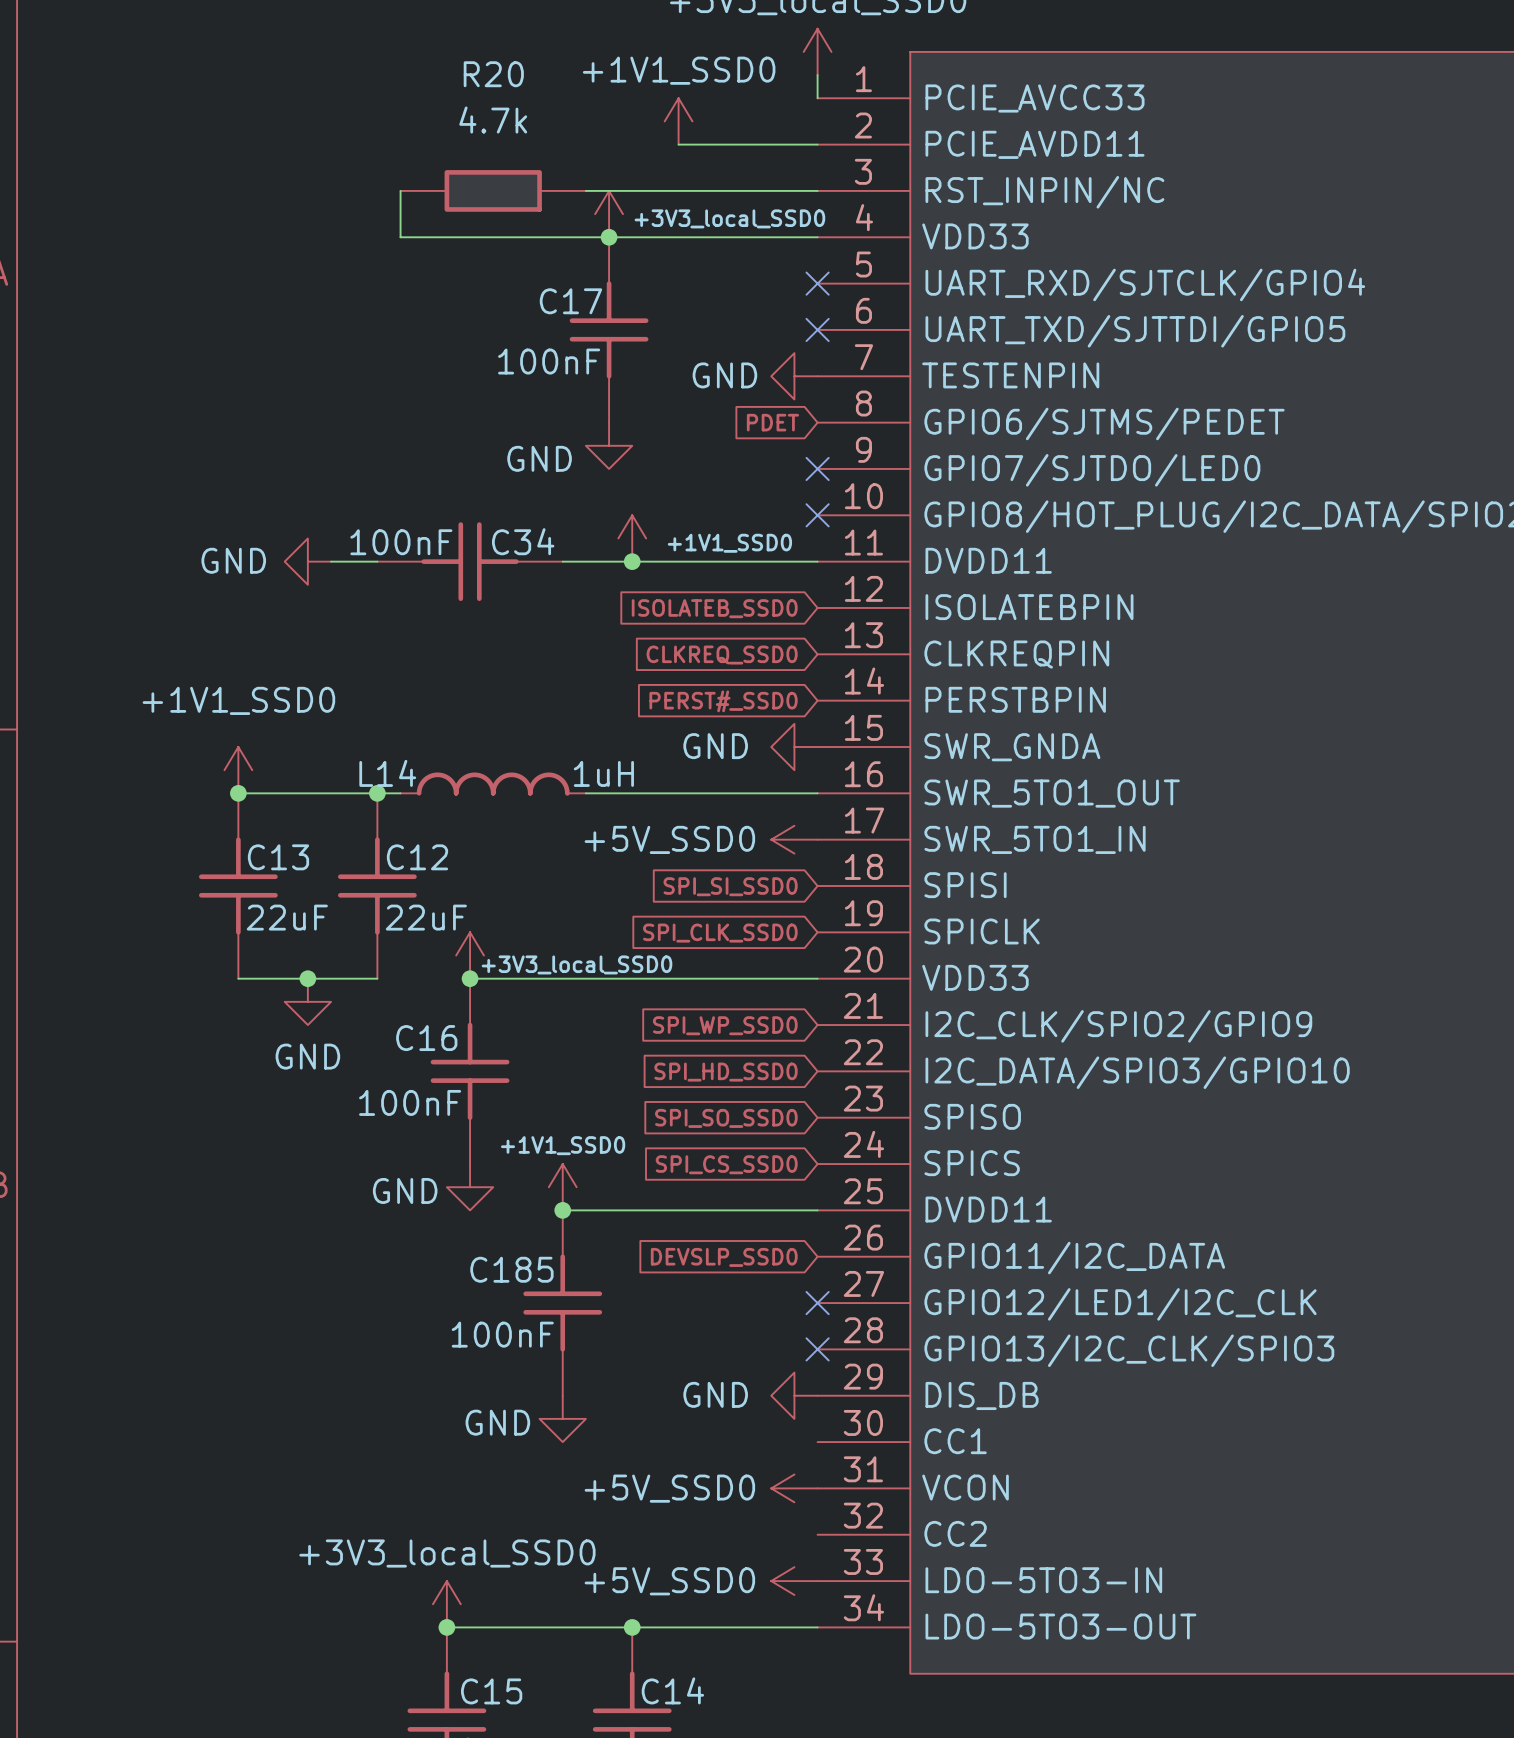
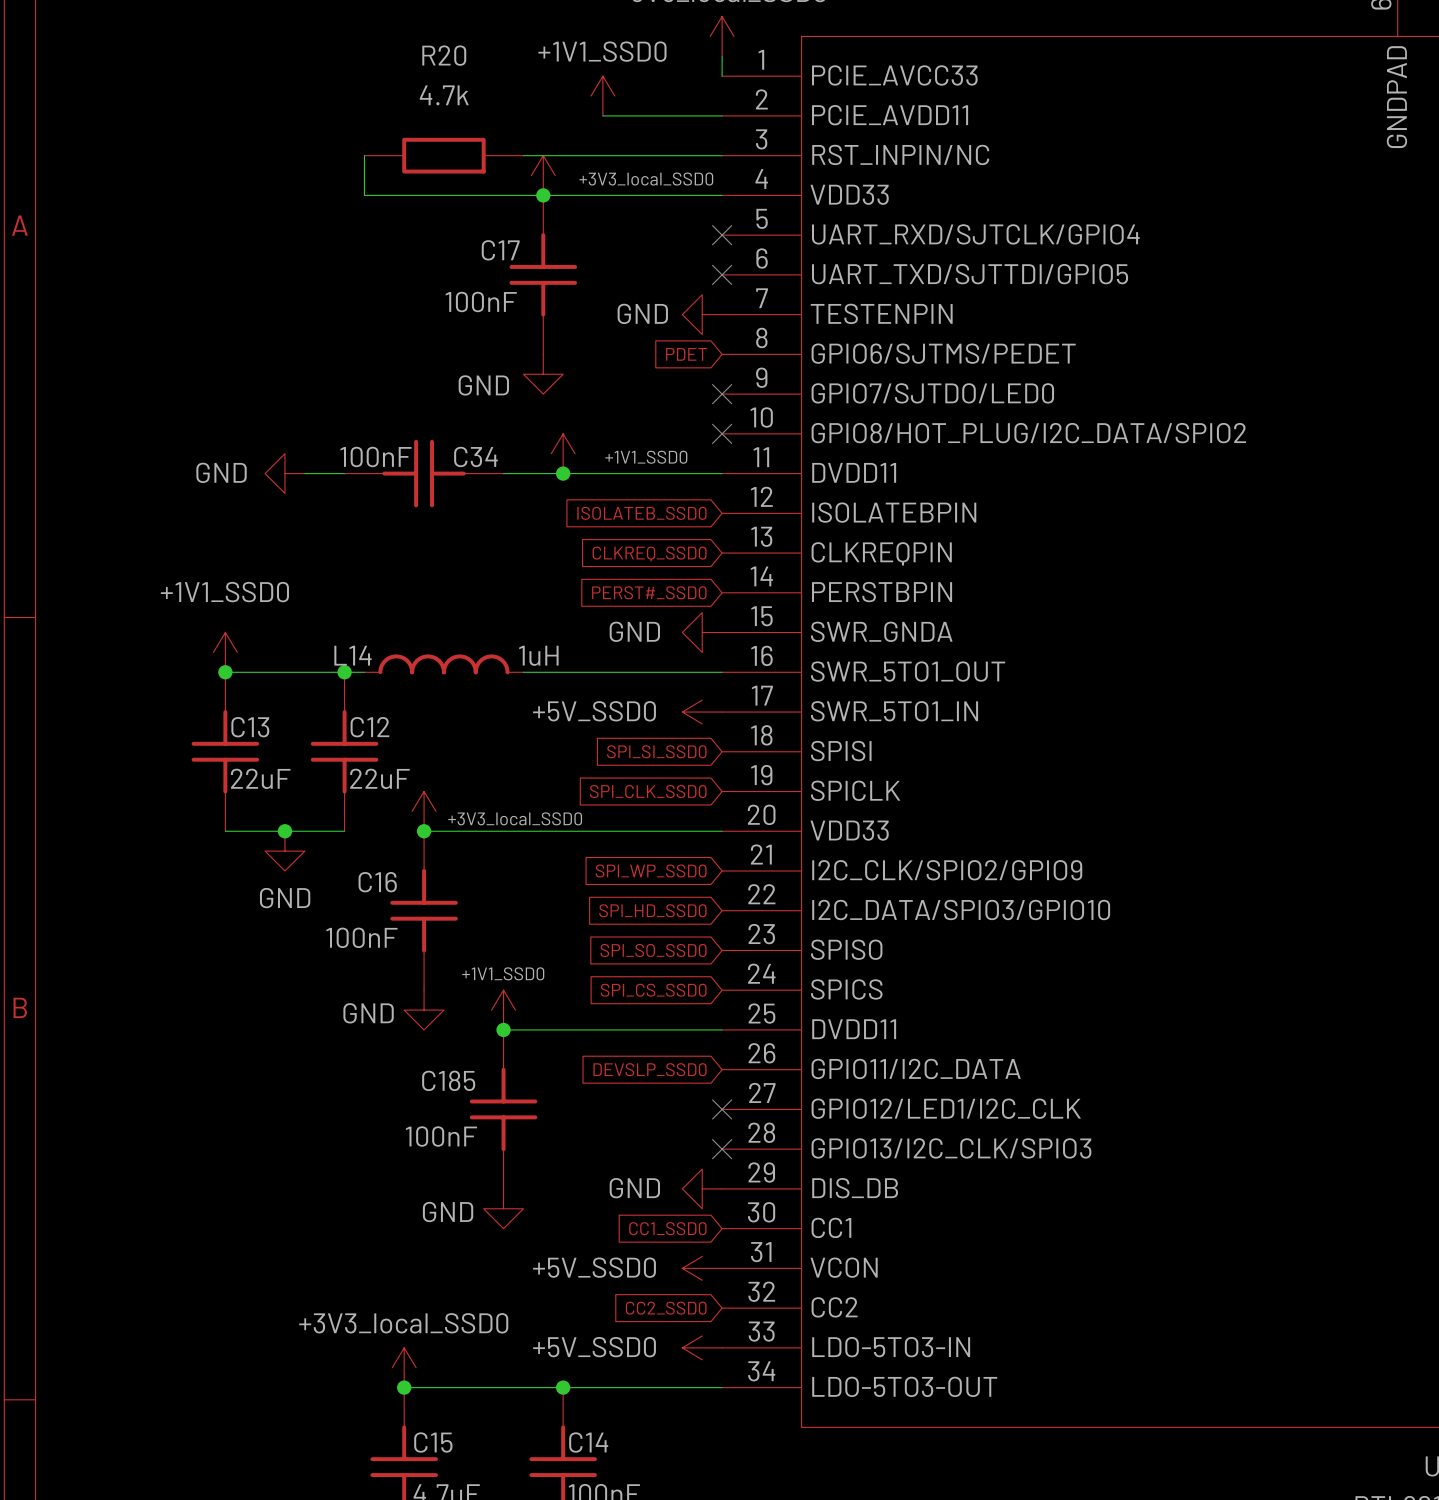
global label: none -> CC1_SSD0 (667, 1228)
global label: none -> CC2_SSD0 (666, 1308)

